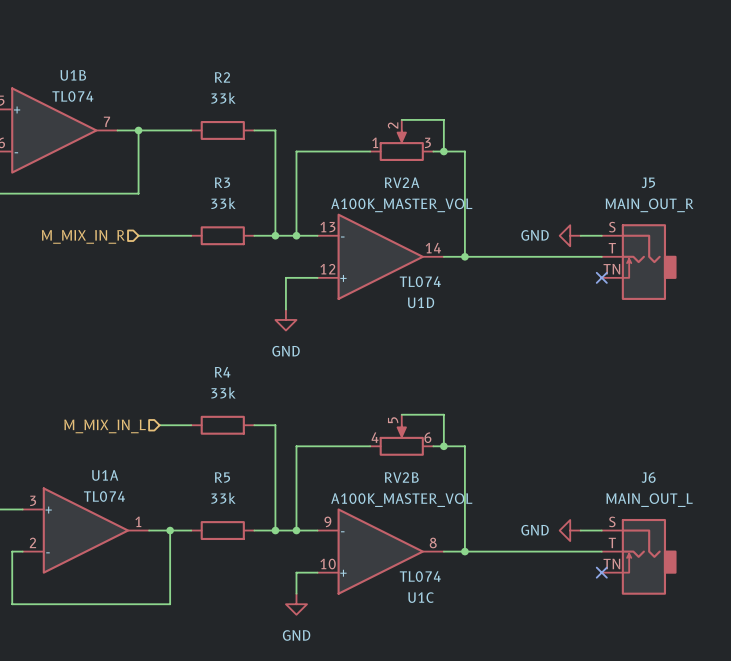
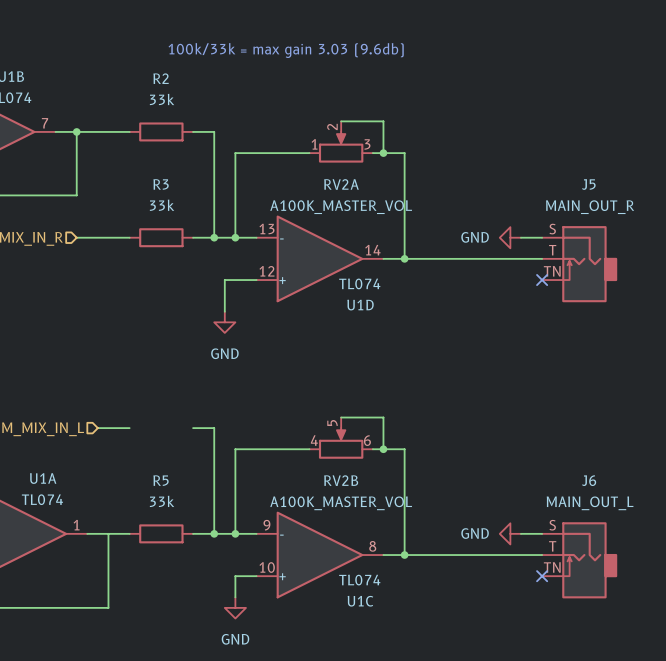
text: none -> 100k/33k = max gain 3.03 (9.6db) (286, 50)
R4: 33k (222, 425) -> none
junction: (170, 530) -> none

